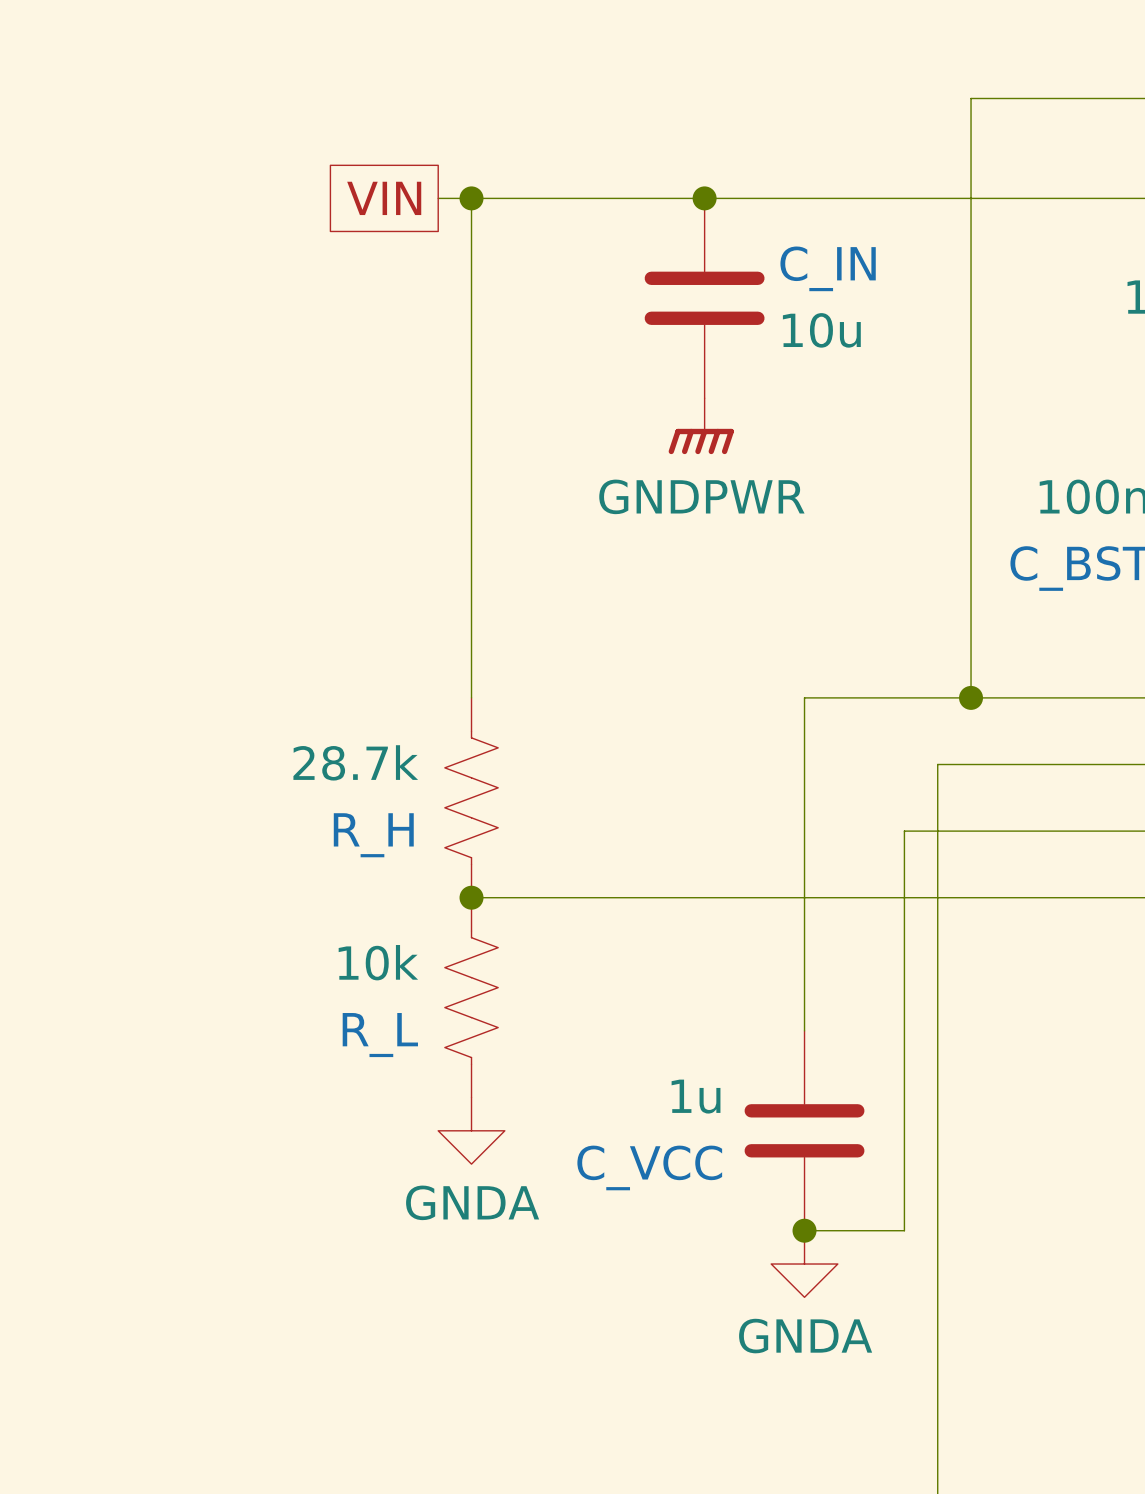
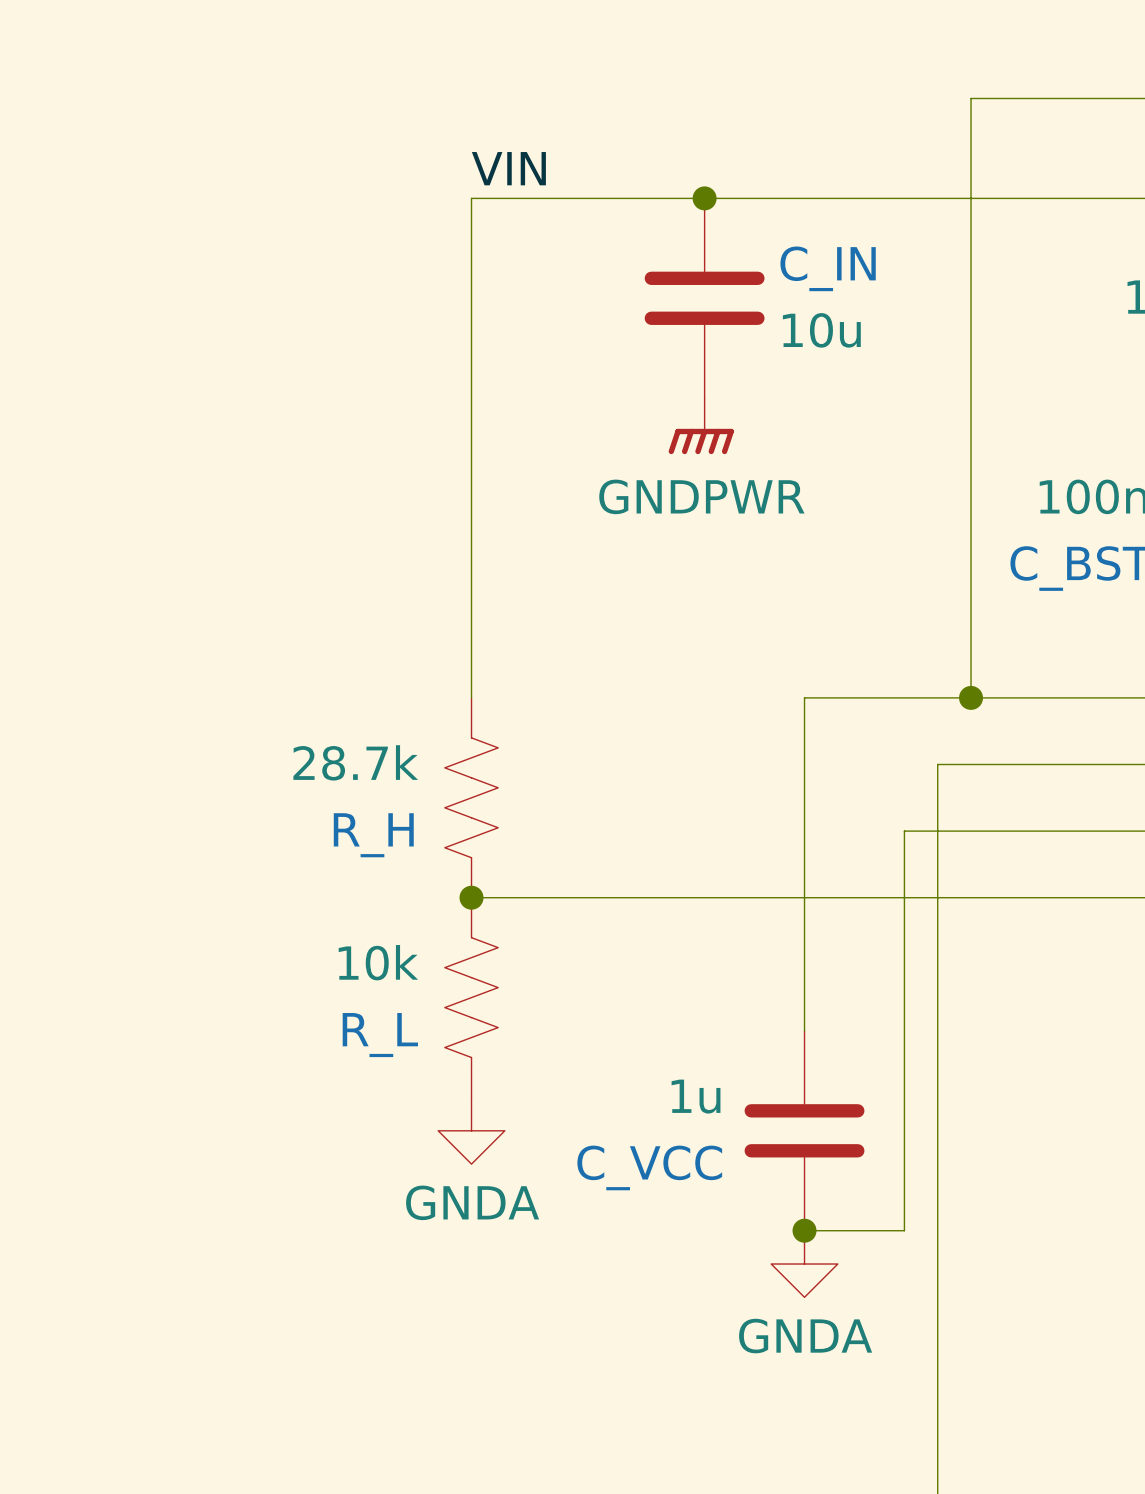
label: none -> VIN (508, 168)
global label: VIN (384, 198) -> none
wire: (438, 198) (471, 198) -> none
junction: (471, 198) -> none

